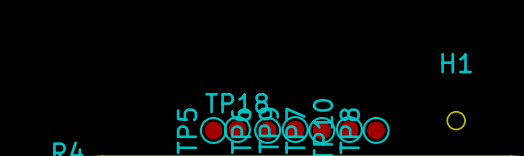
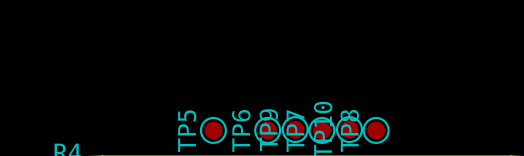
H1: (456, 120) -> none
TP18: (237, 129) -> none

